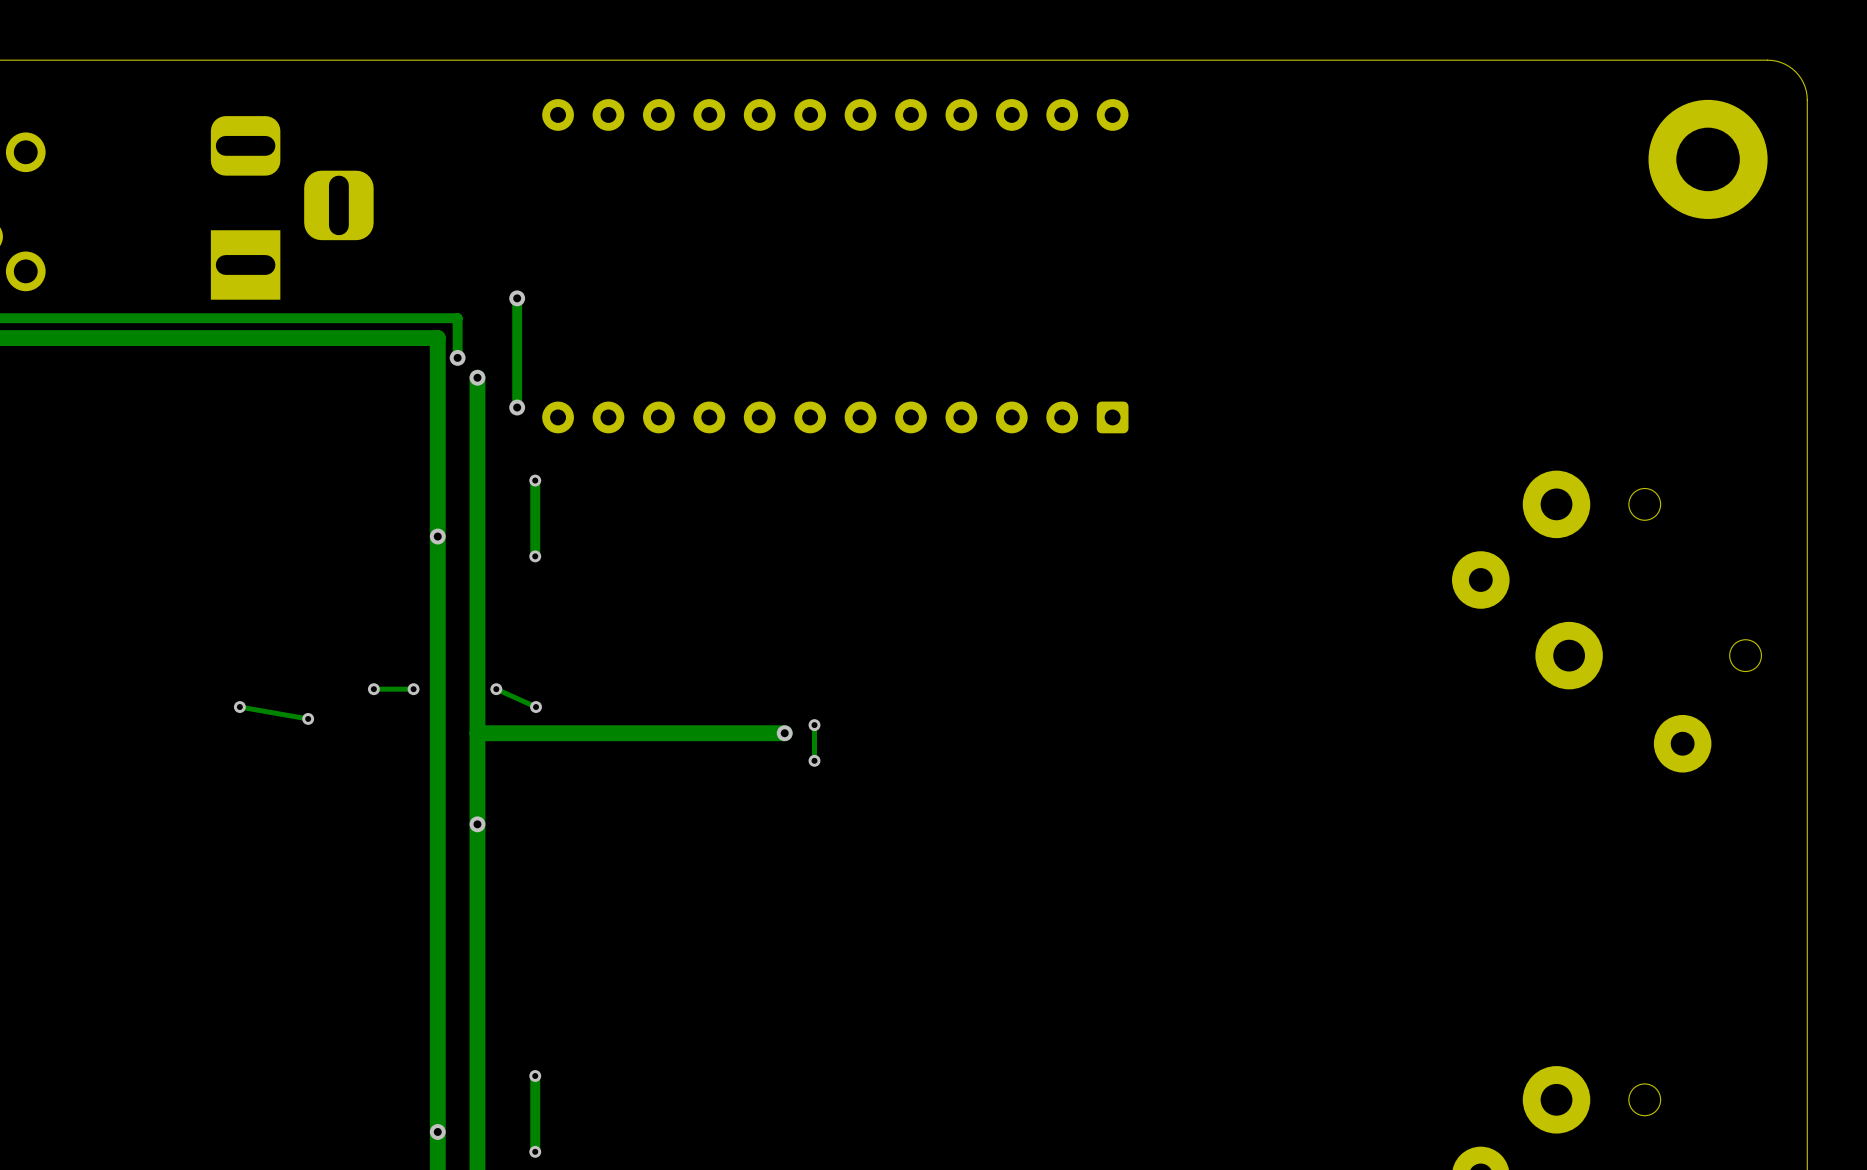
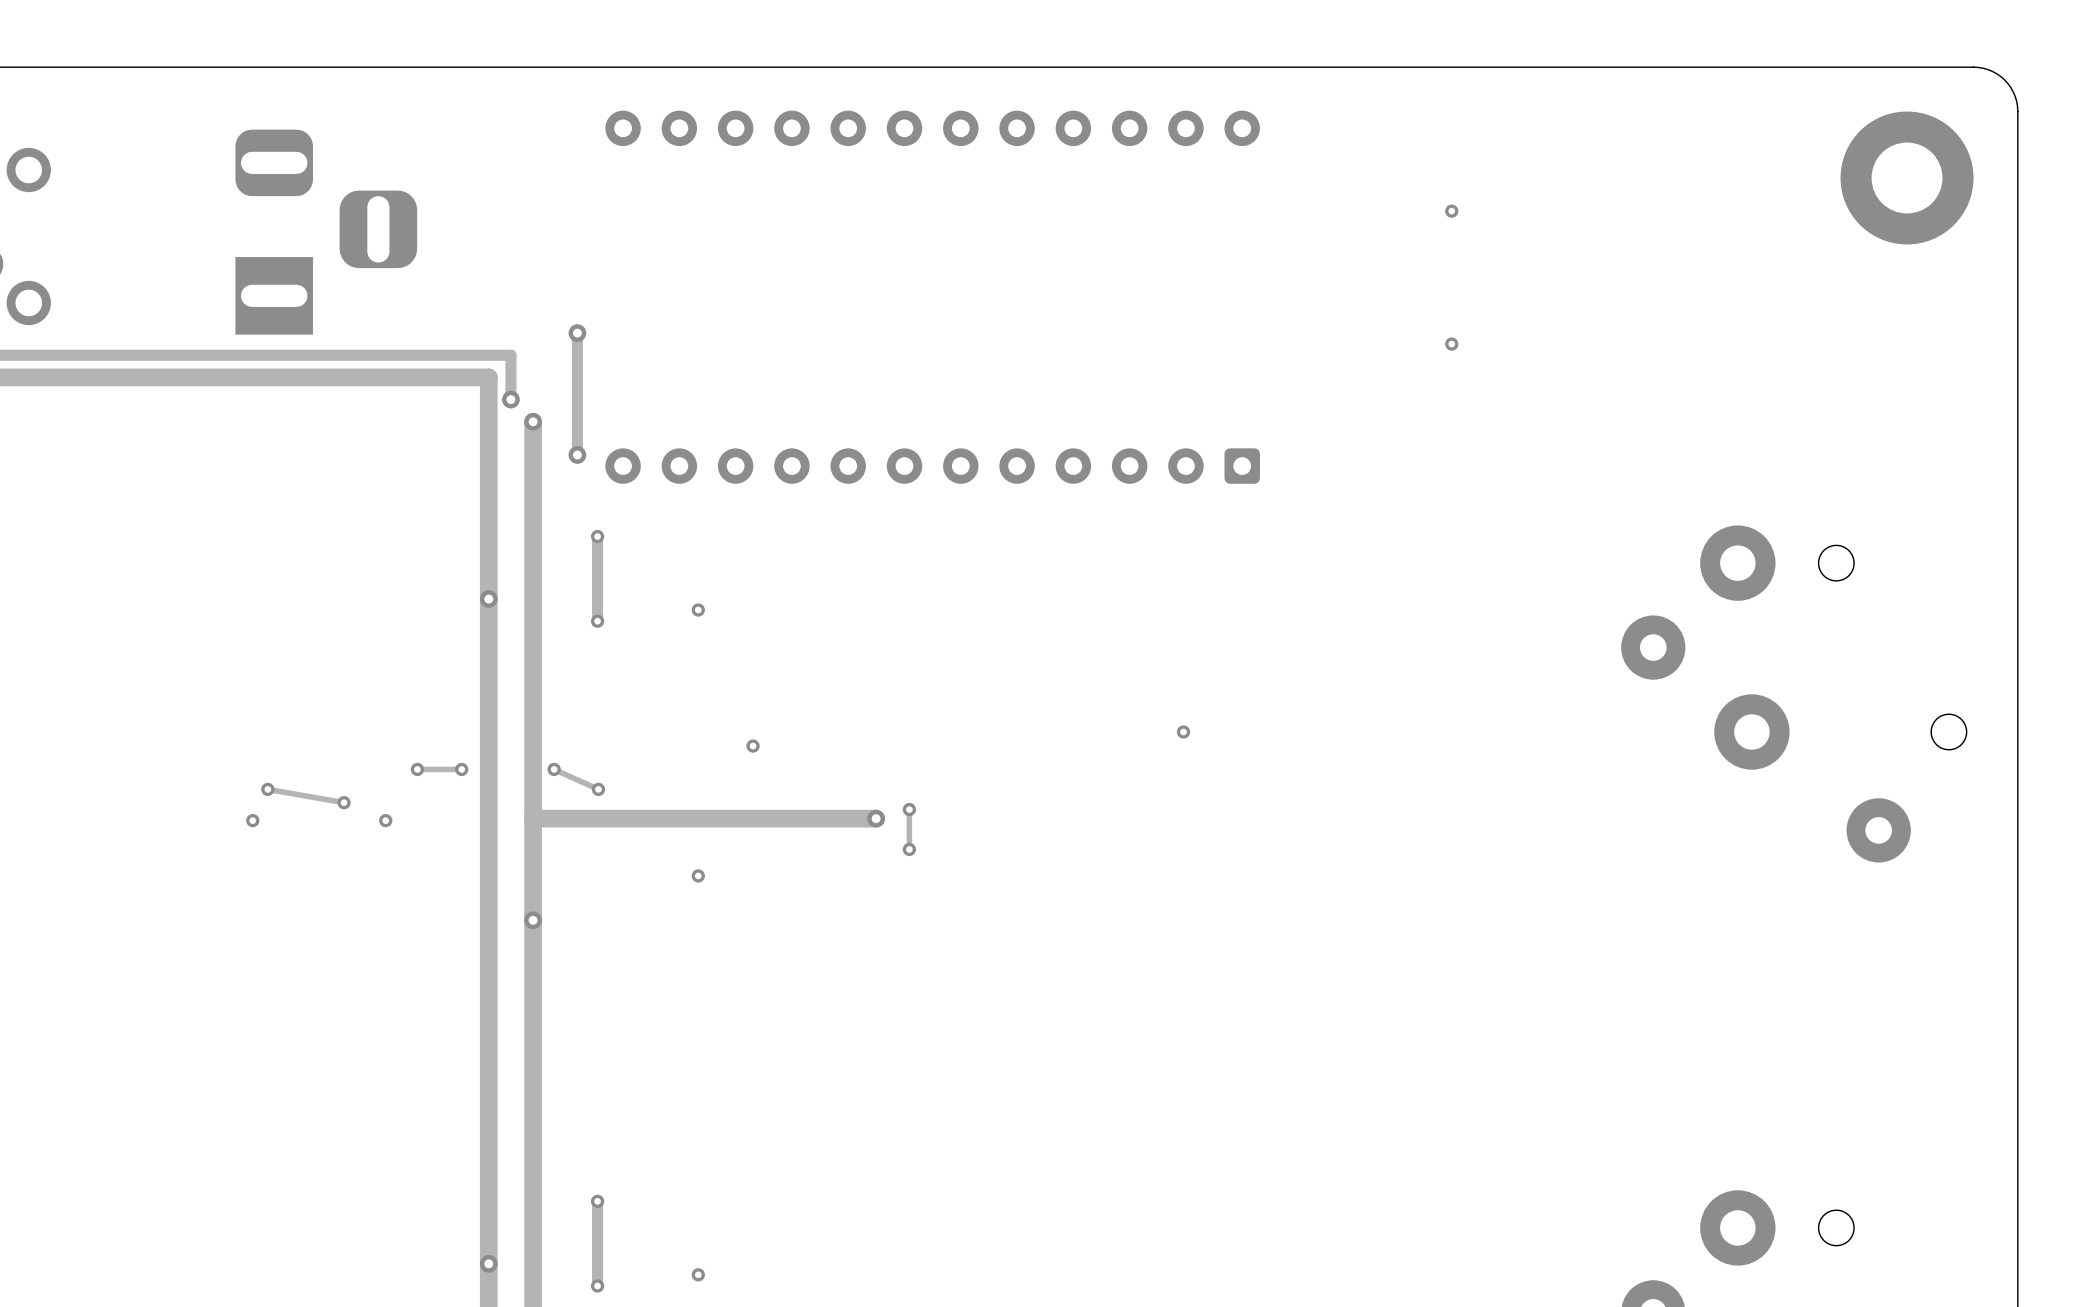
via: none -> (1451, 211)
via: none -> (1451, 344)
via: none -> (698, 610)
via: none -> (1183, 731)
via: none -> (753, 746)
via: none -> (252, 820)
via: none -> (385, 820)
via: none -> (698, 875)
via: none -> (698, 1274)

